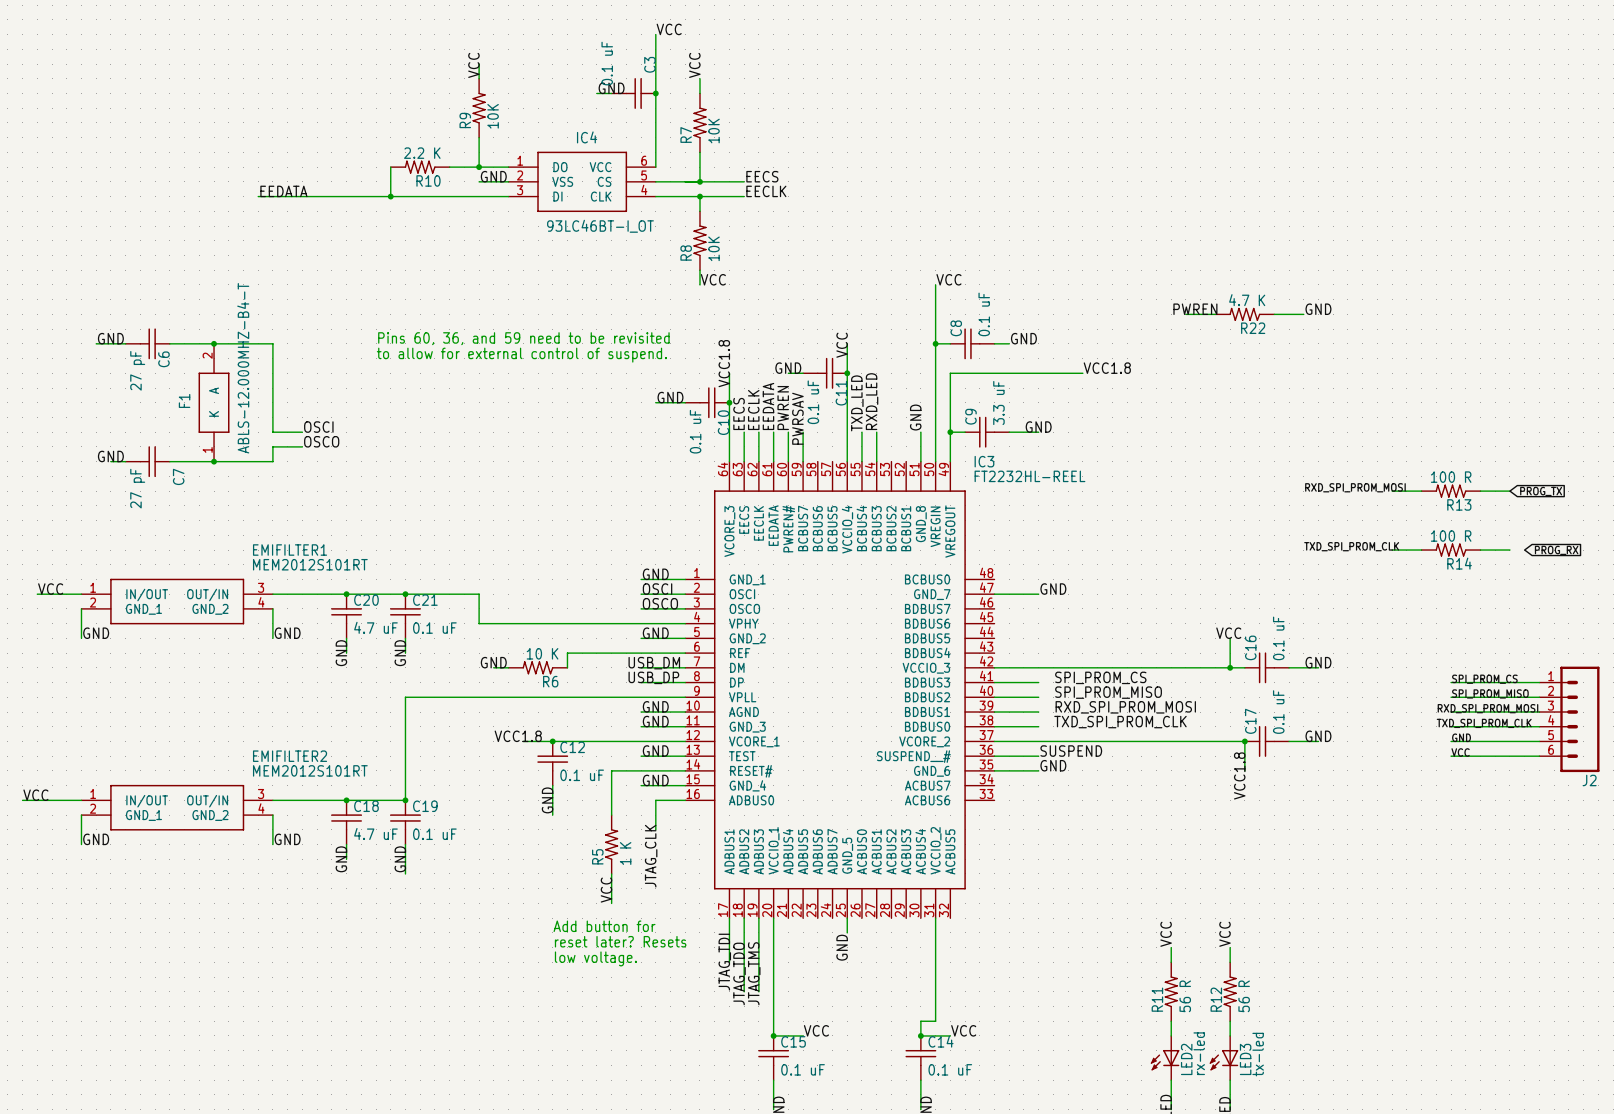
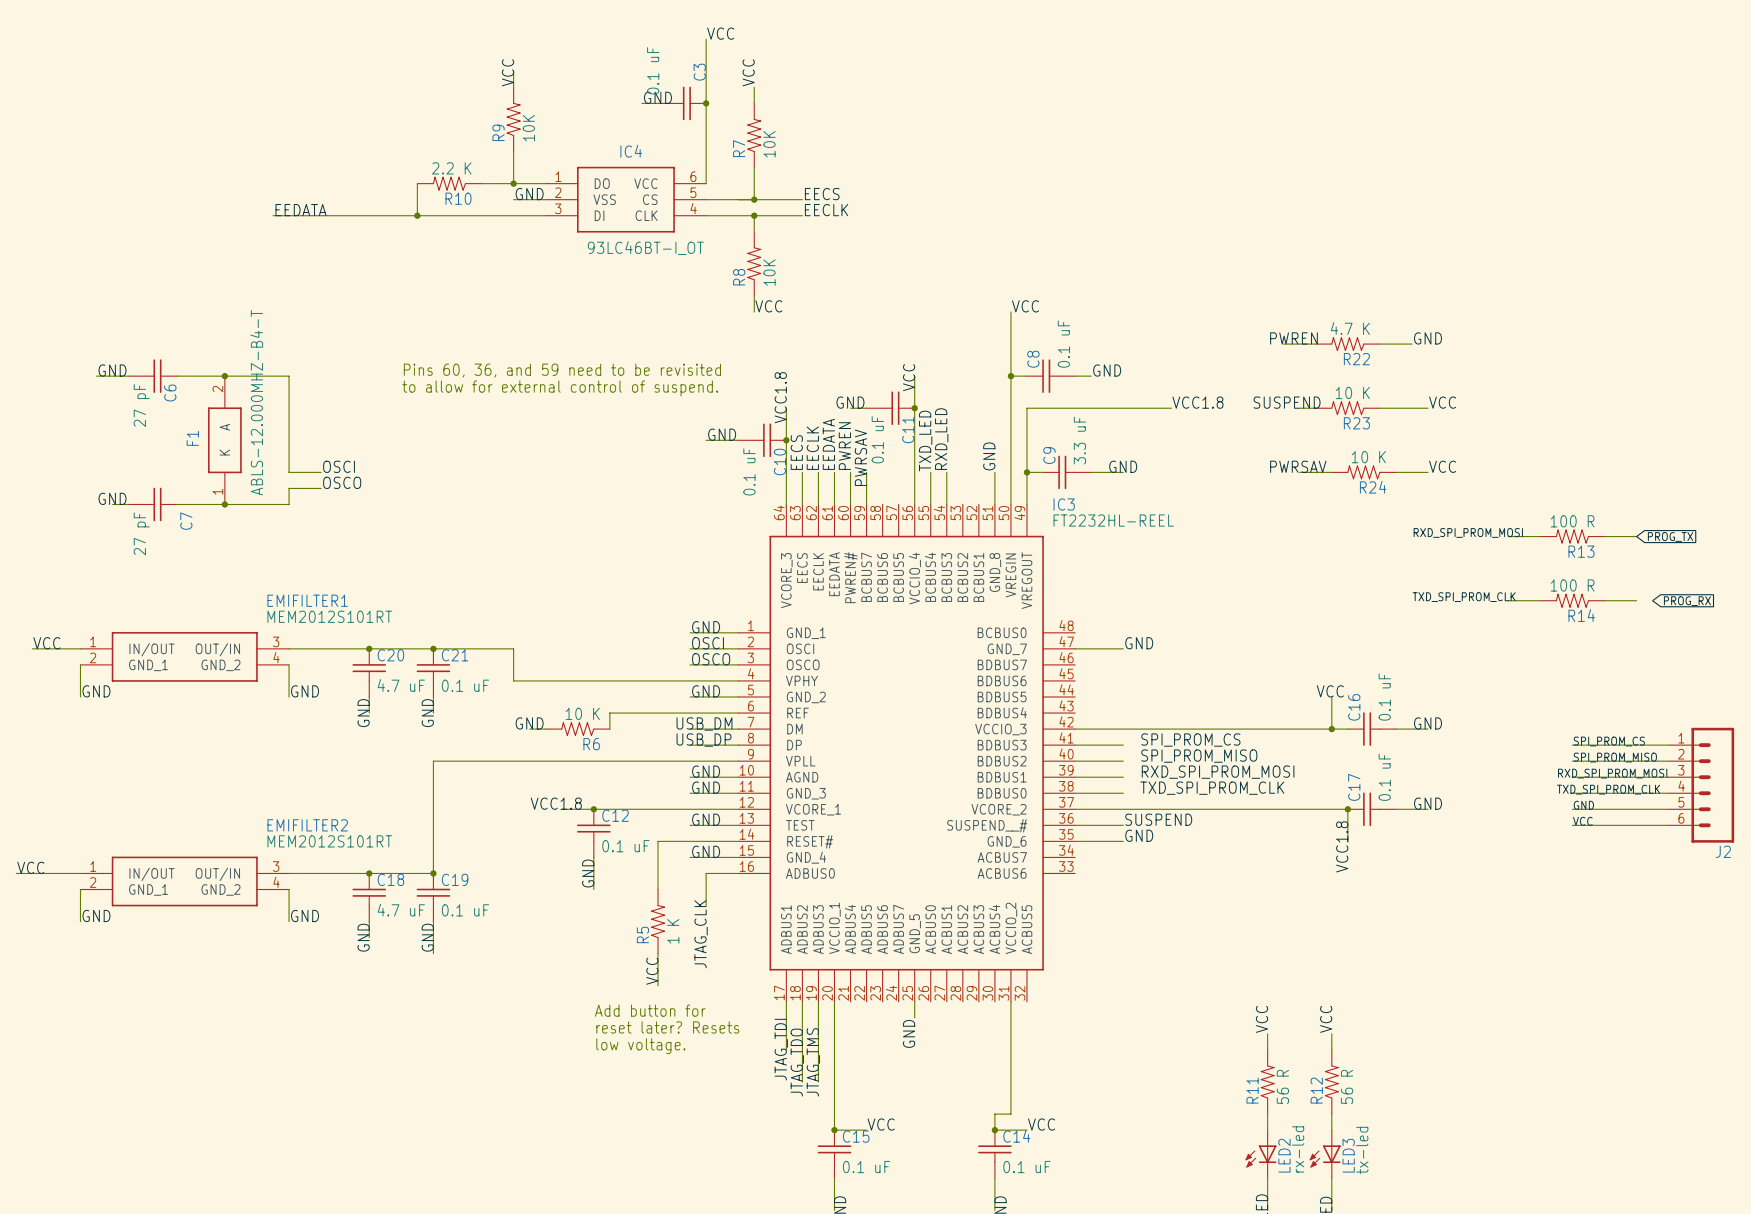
label: none -> SUSPEND (1287, 402)
label: none -> VCC (1442, 402)
wire: none -> (1299, 408) (1315, 408)
R23: none -> 10 K (1347, 408)
wire: none -> (1379, 408) (1428, 408)
label: none -> PWRSAV (1298, 466)
label: none -> VCC (1442, 466)
wire: none -> (1299, 472) (1331, 472)
R24: none -> 10 K (1363, 472)
wire: none -> (1395, 472) (1428, 472)

